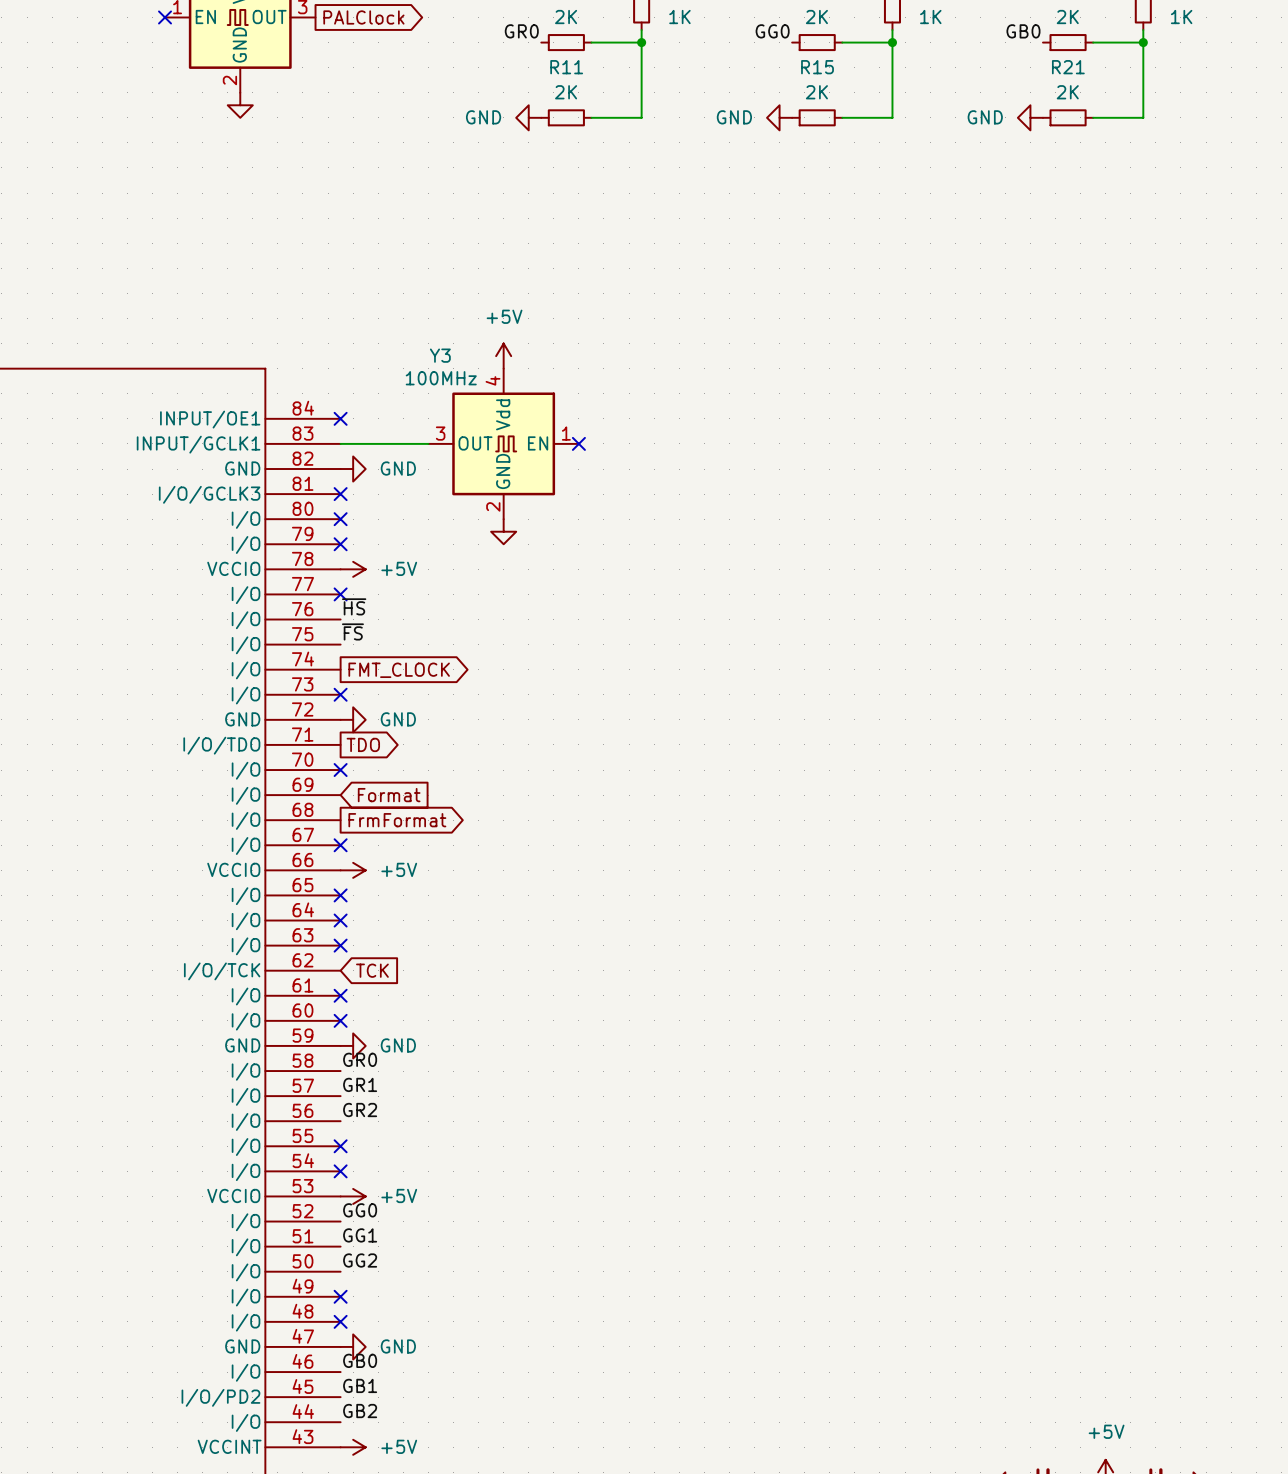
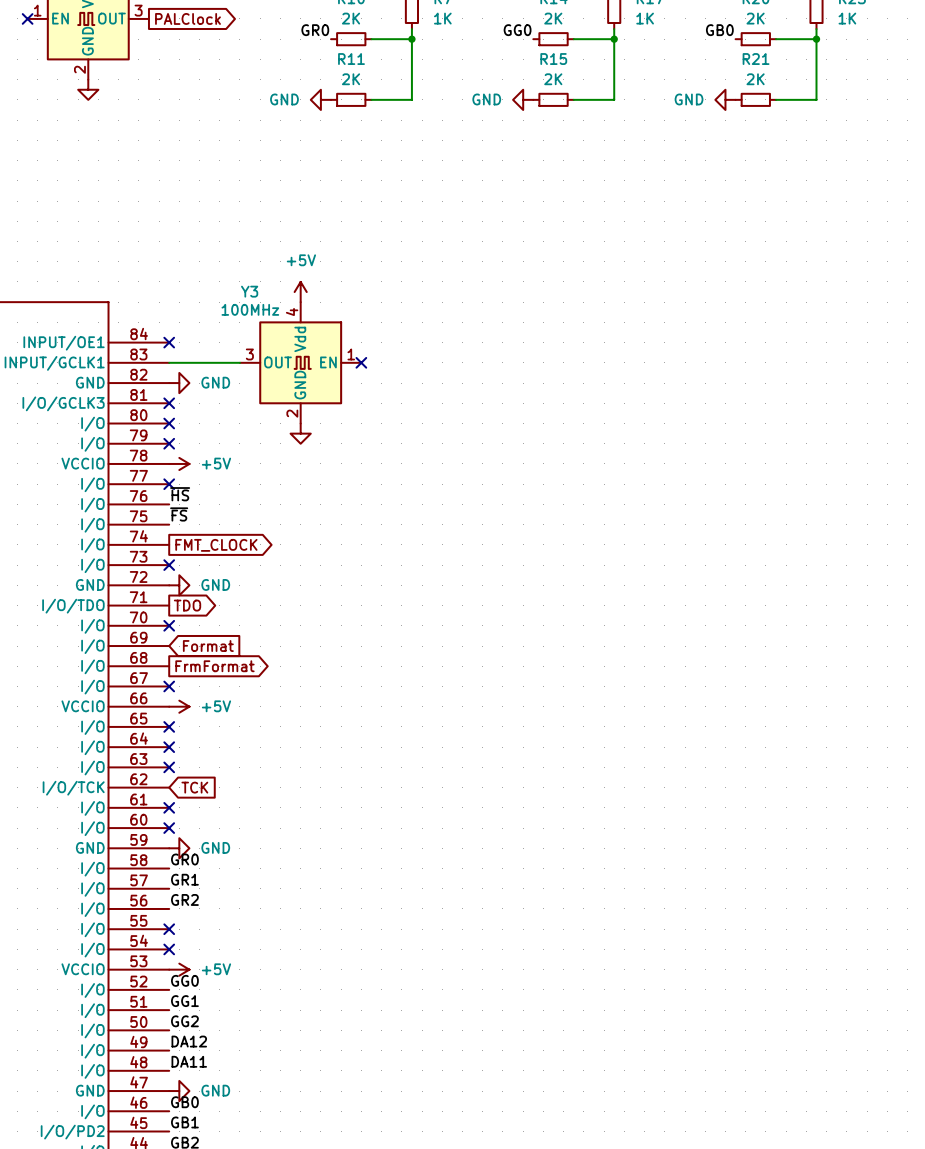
label: none -> DA12 (189, 1041)
no-connect mark: (340, 1296) -> none
label: none -> DA11 (189, 1061)
no-connect mark: (340, 1321) -> none

